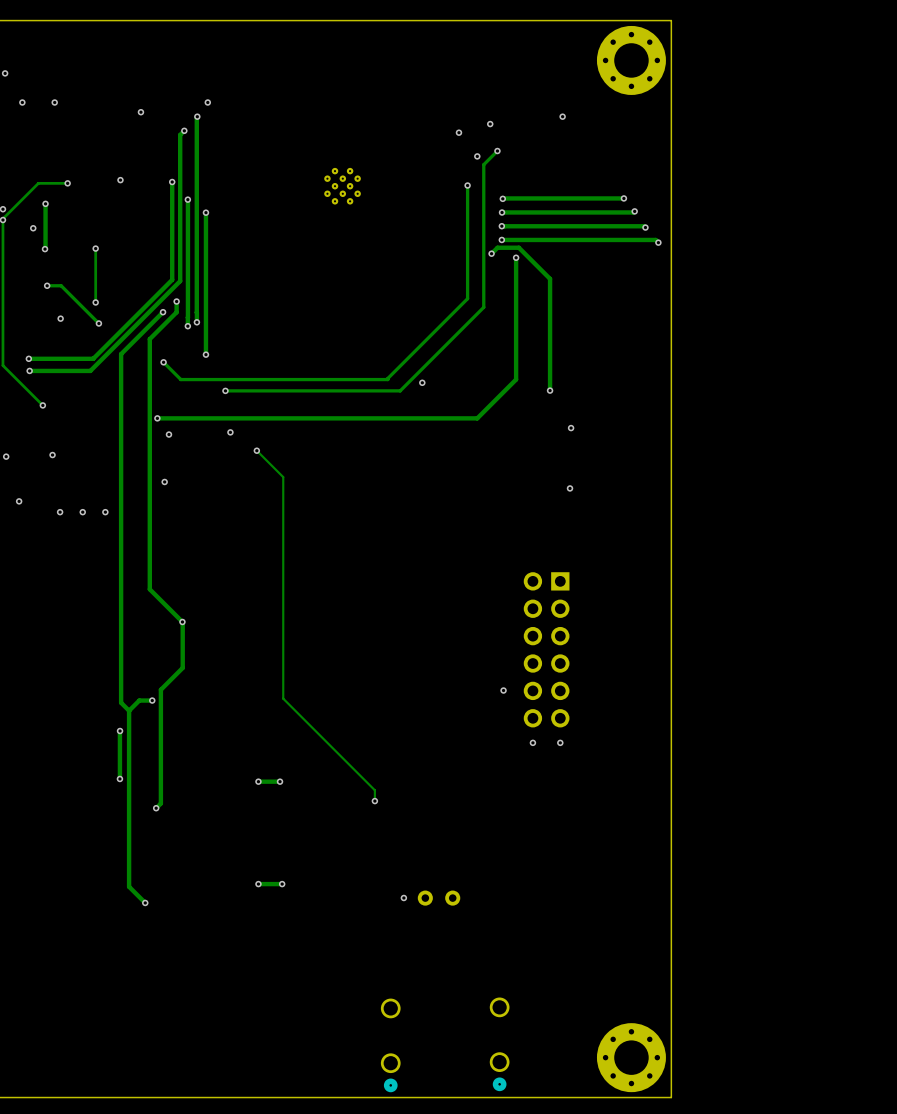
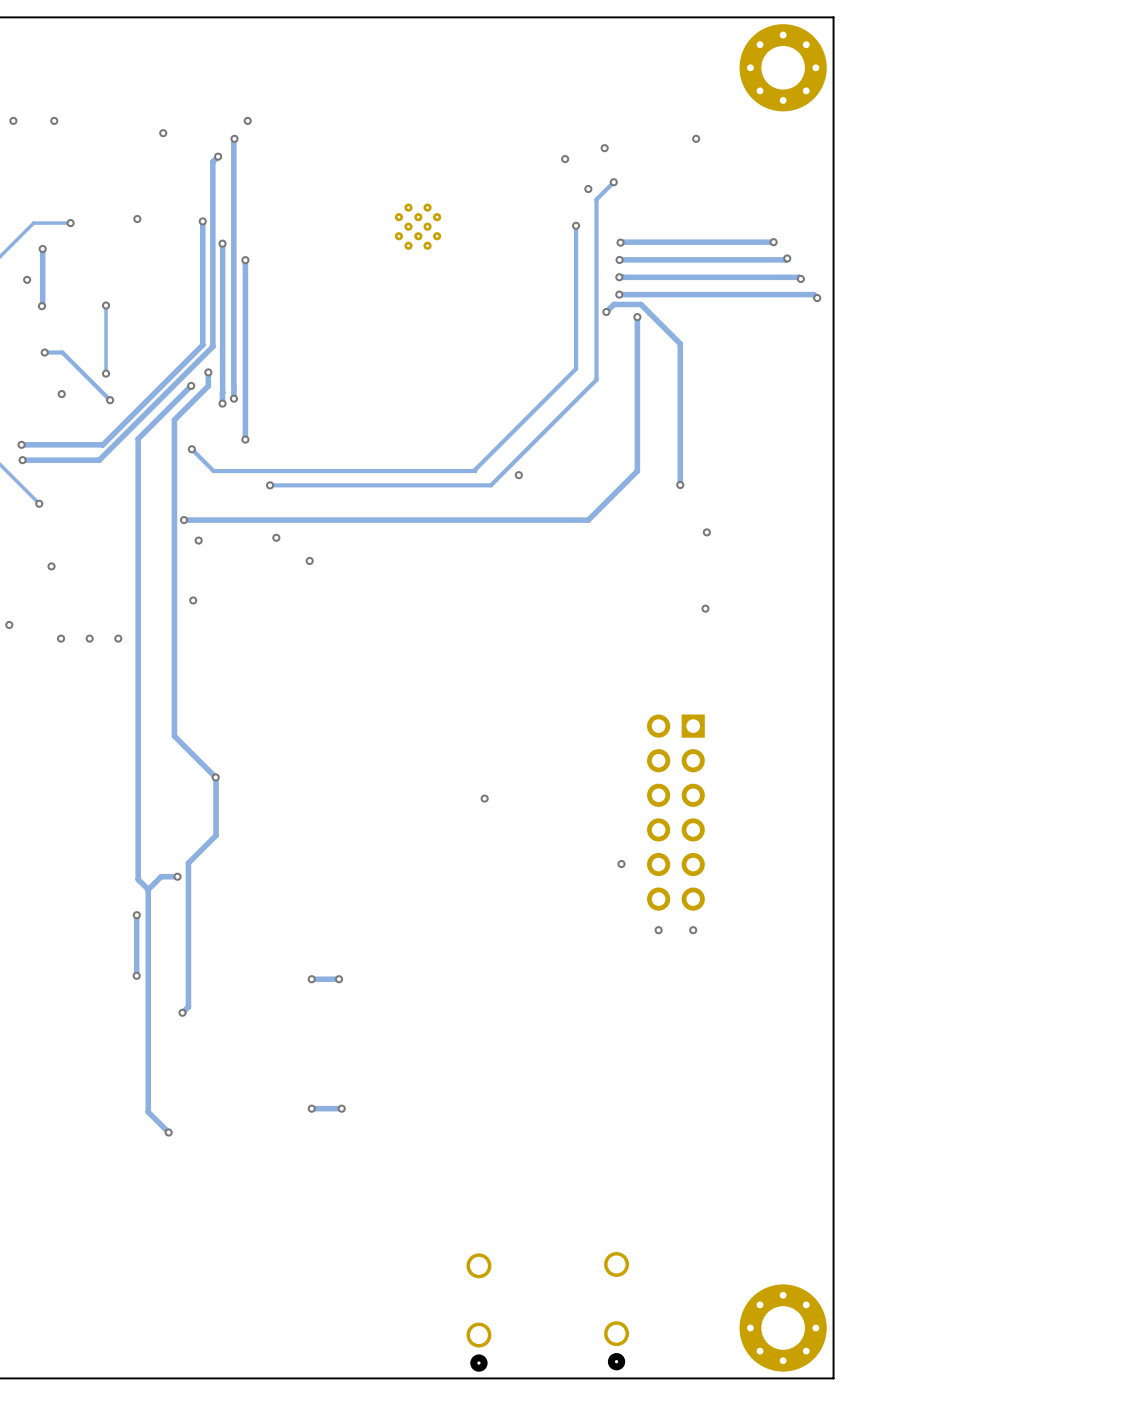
track: (256, 450) (283, 477) (283, 698) (374, 790) (374, 801) -> none
via: none -> (484, 798)
via: (374, 801) -> none
via: (403, 897) -> none
part: (439, 898) -> none

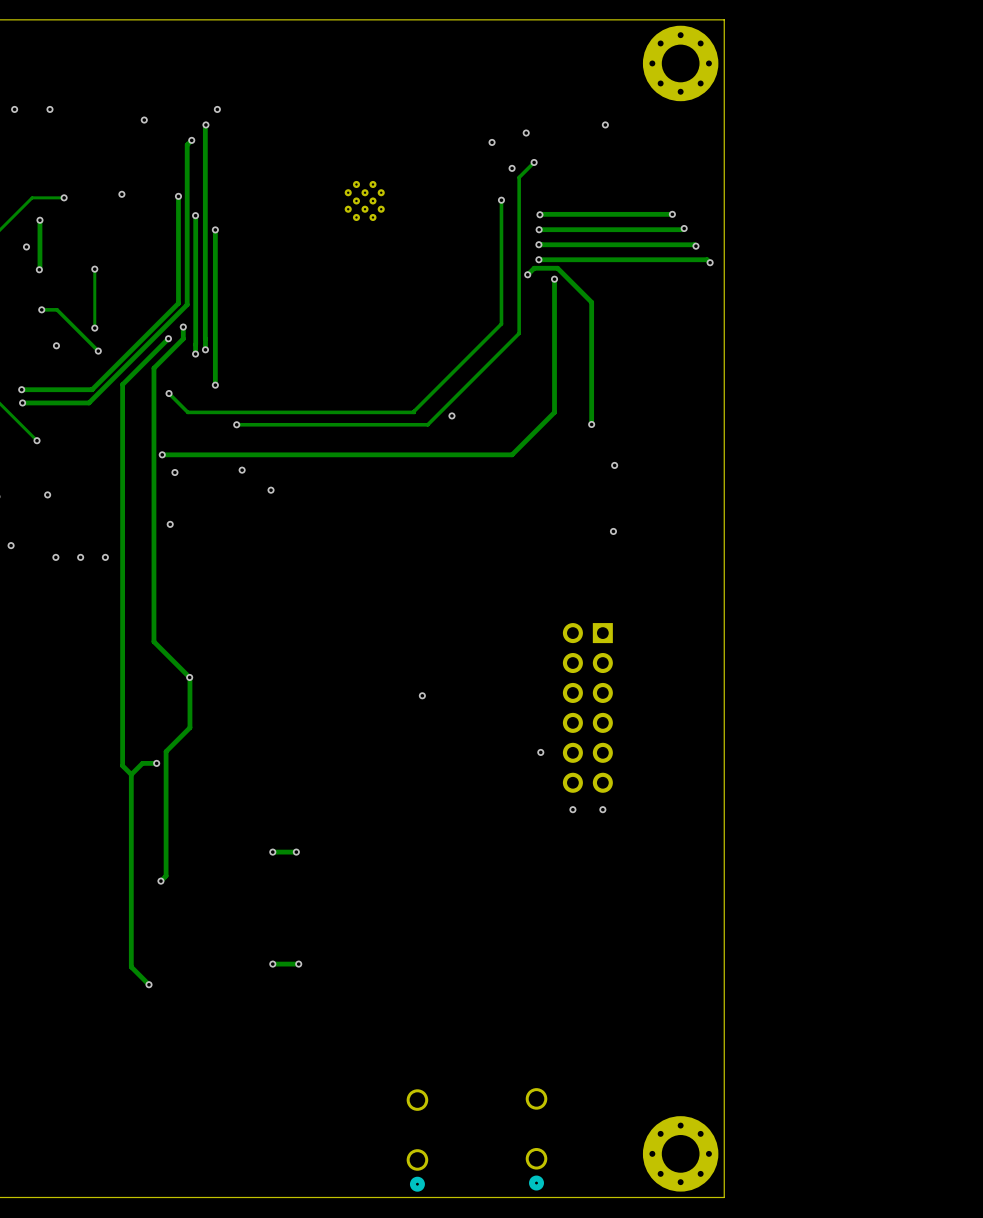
track: (136, 915) (136, 975) -> none
via: (136, 915) -> none
via: (136, 975) -> none

